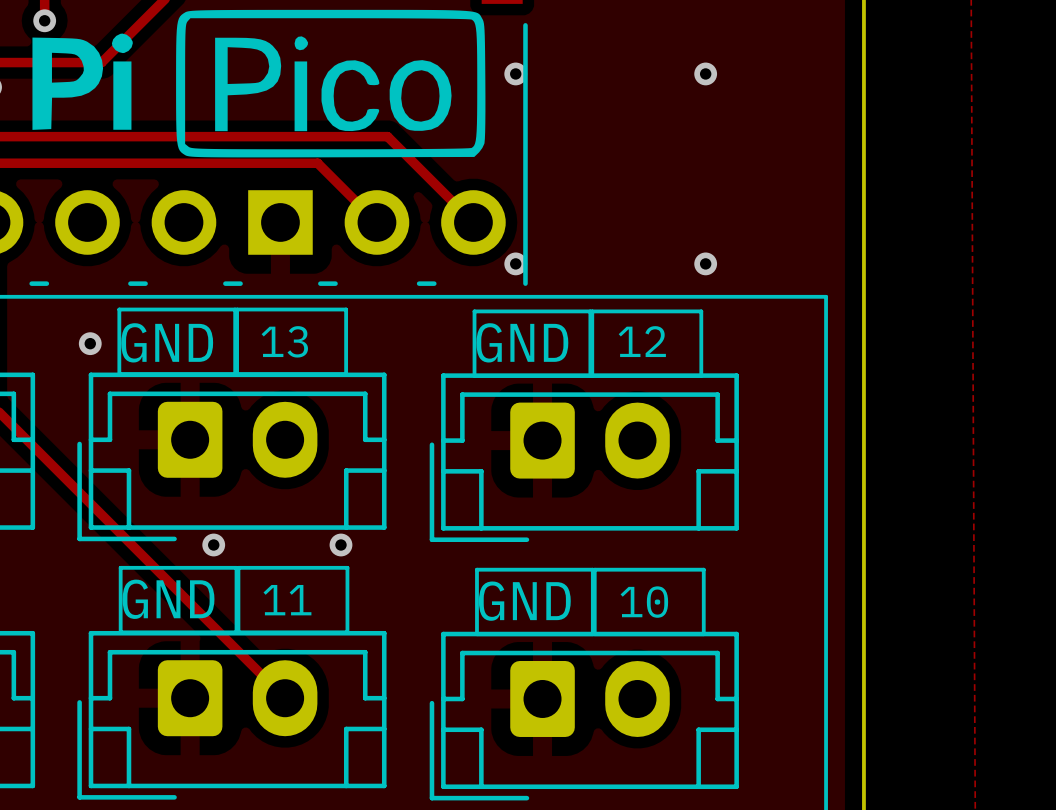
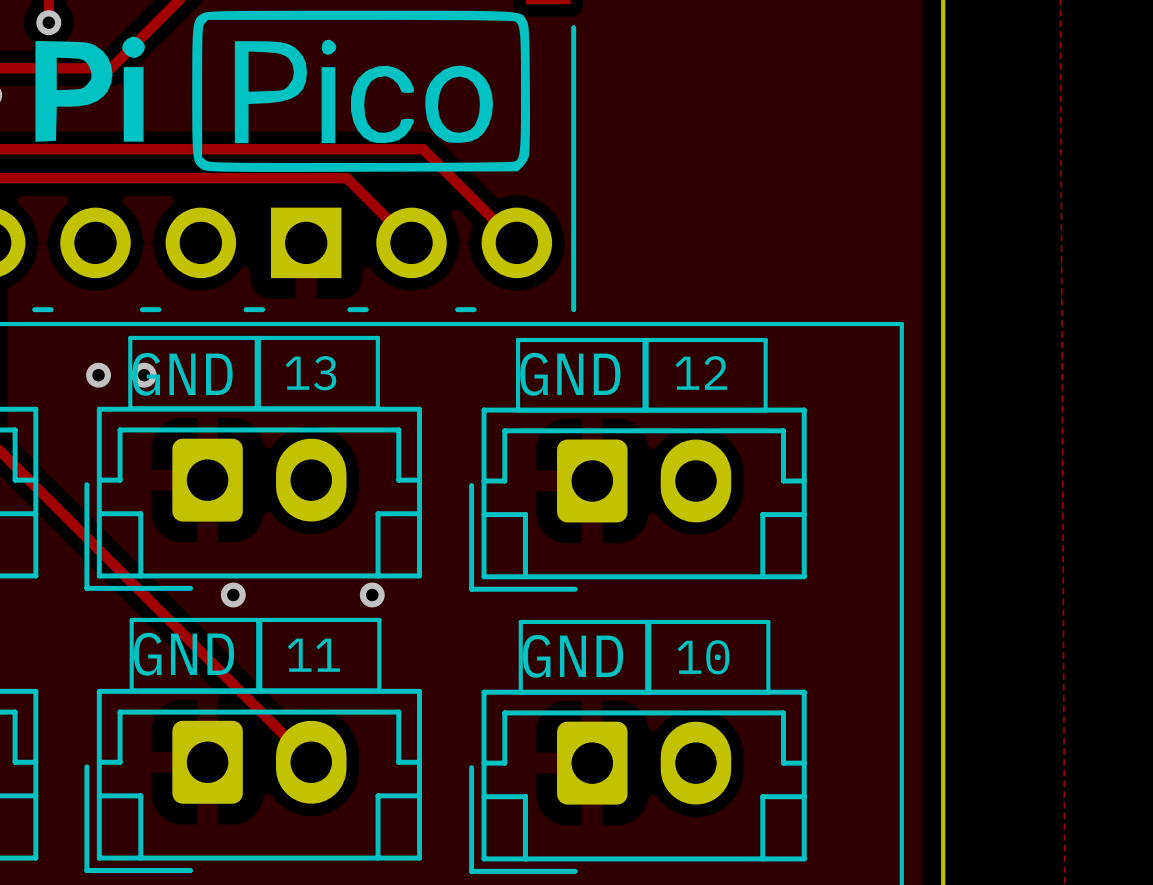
via: (515, 73) -> none
via: (705, 73) -> none
via: (515, 263) -> none
via: (705, 263) -> none
via: none -> (144, 375)

